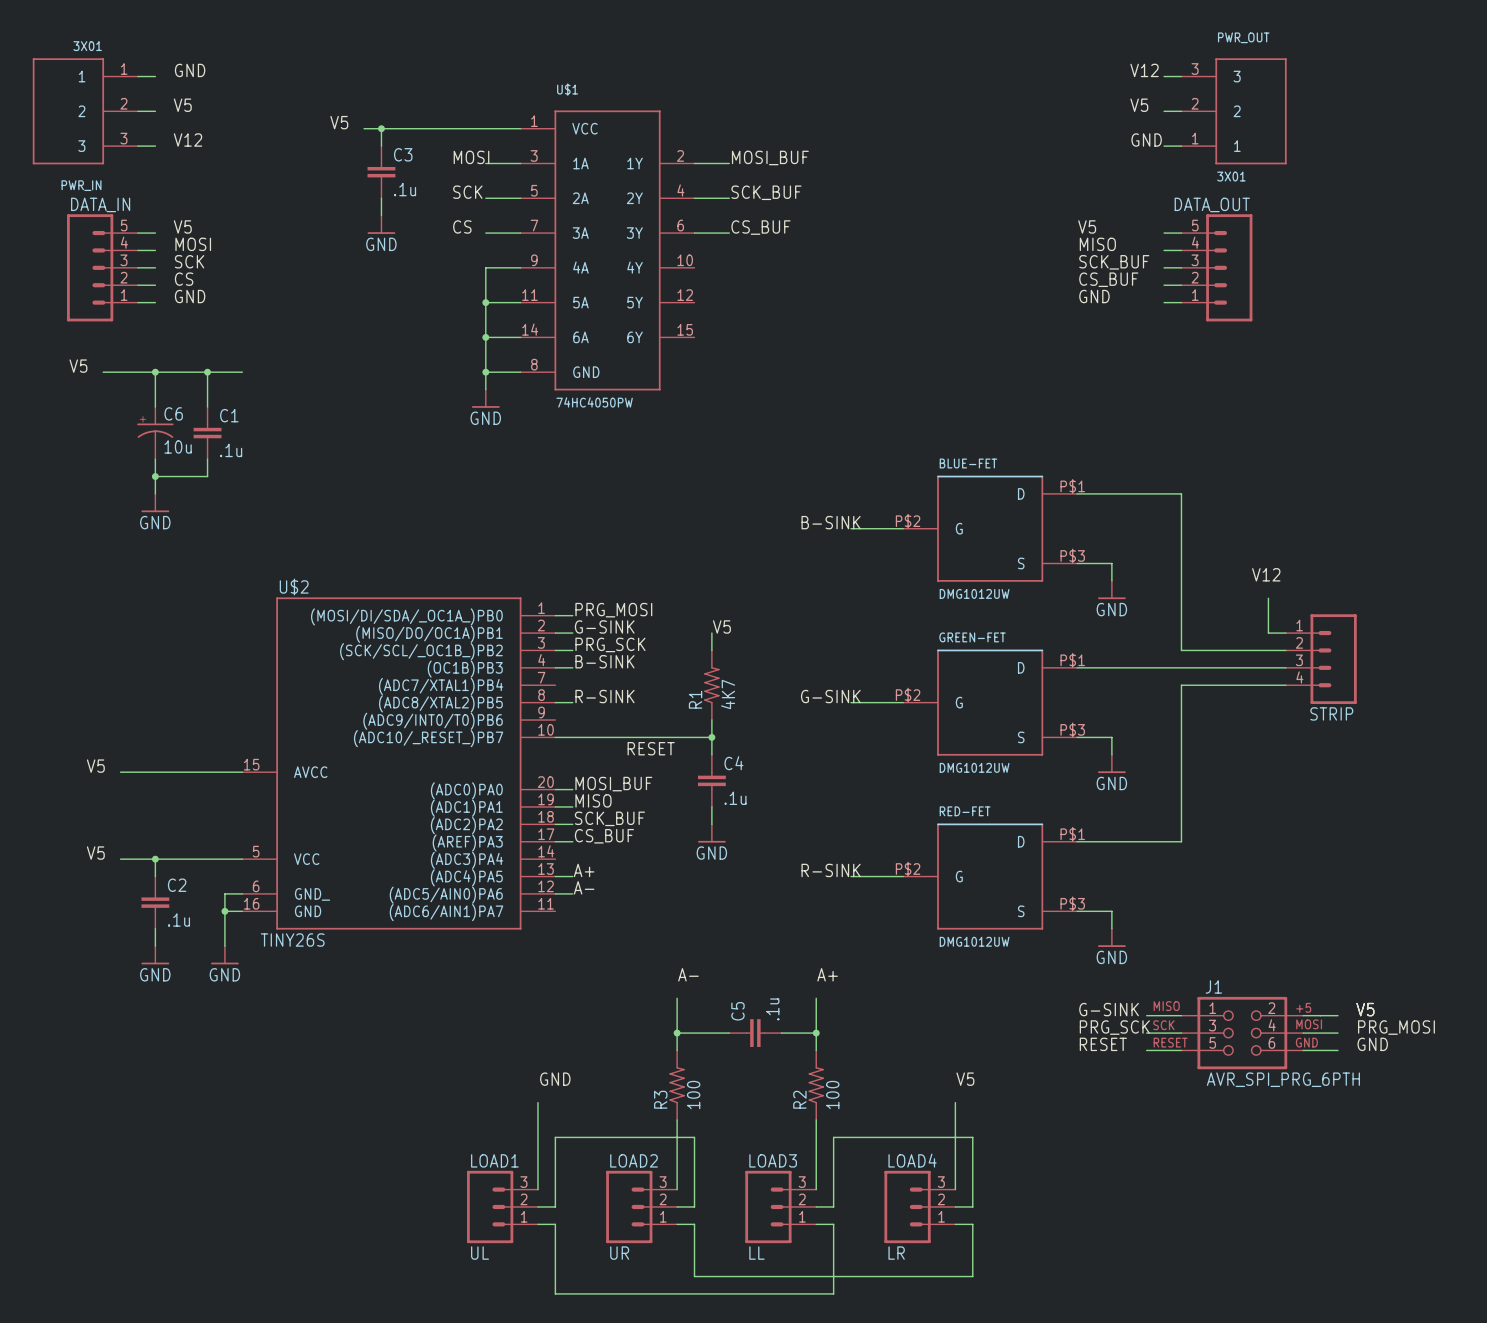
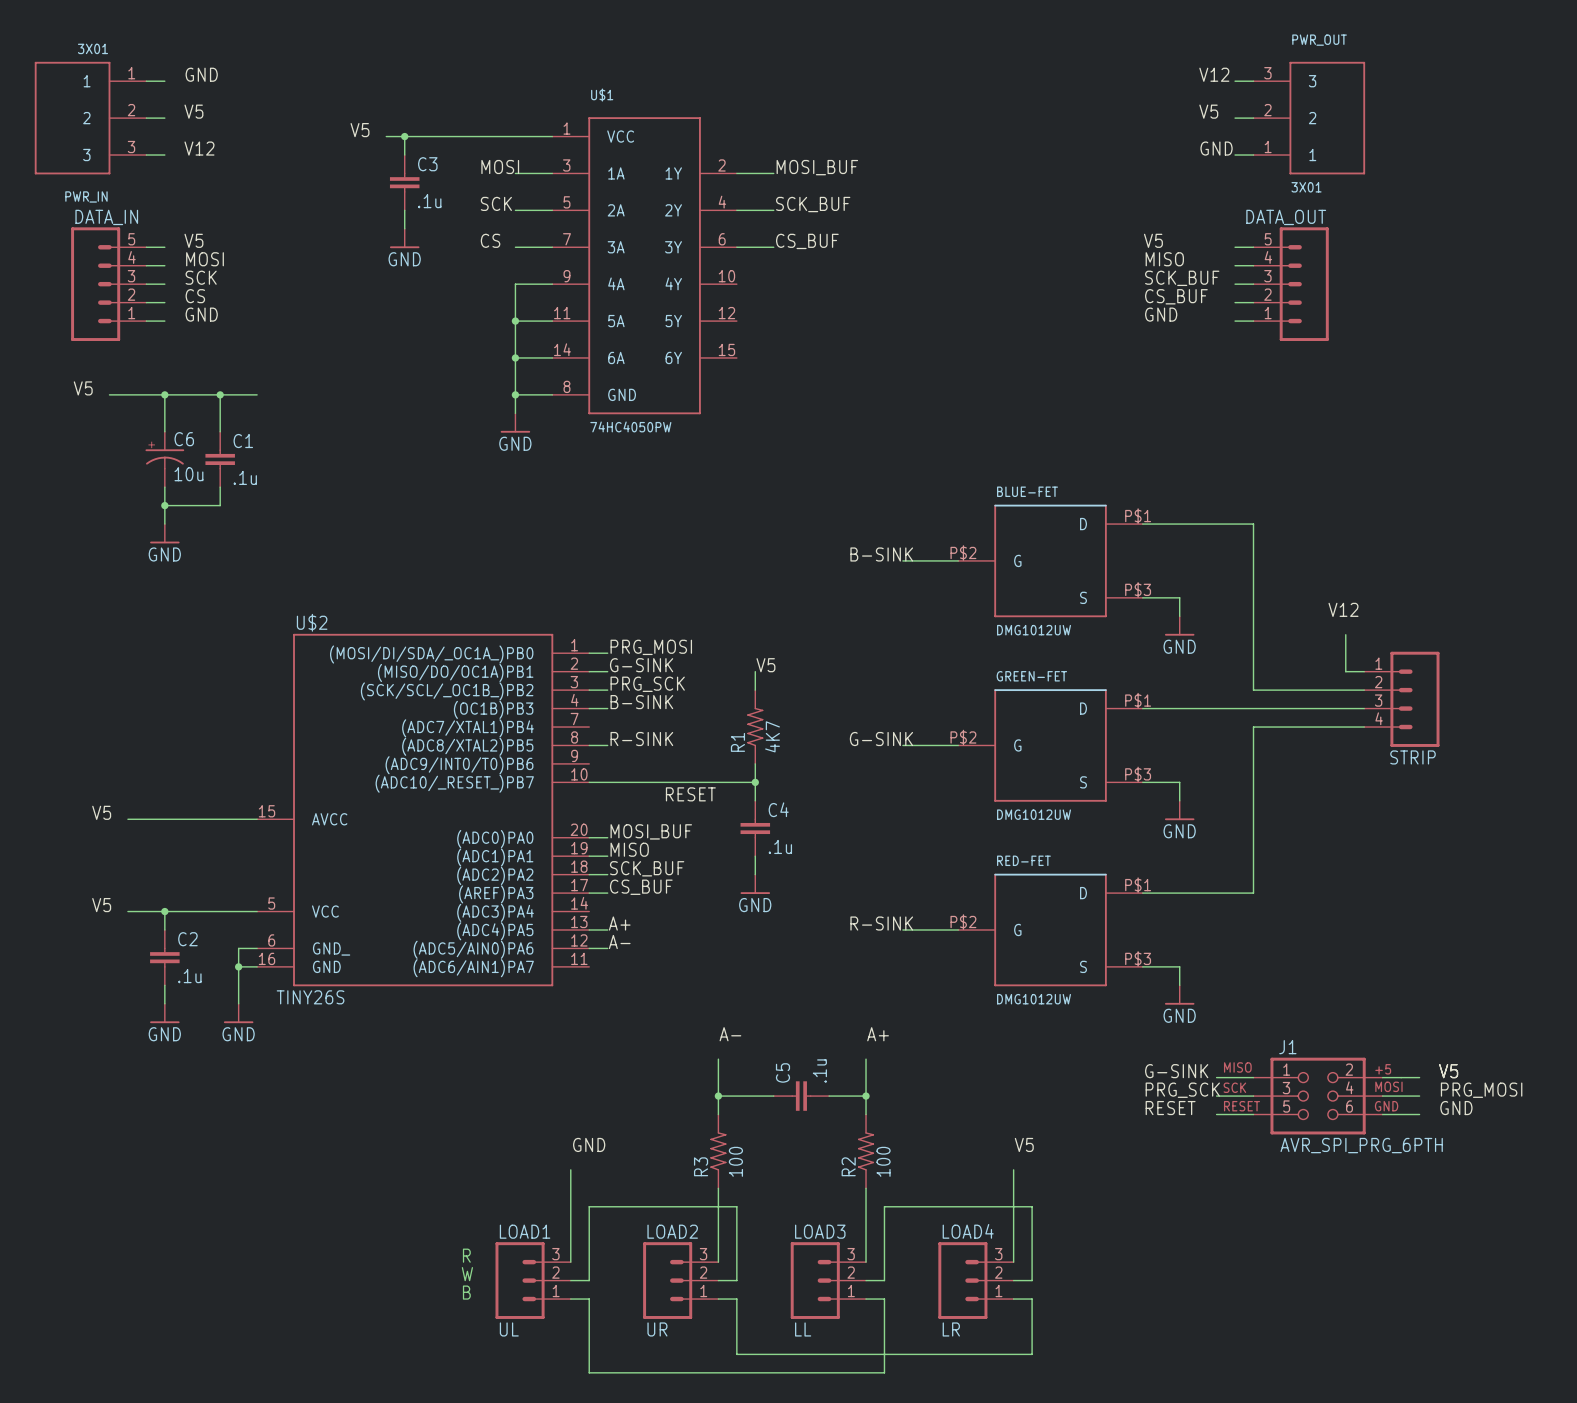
text: none -> R (466, 1255)
text: none -> W (467, 1274)
text: none -> B (466, 1292)

